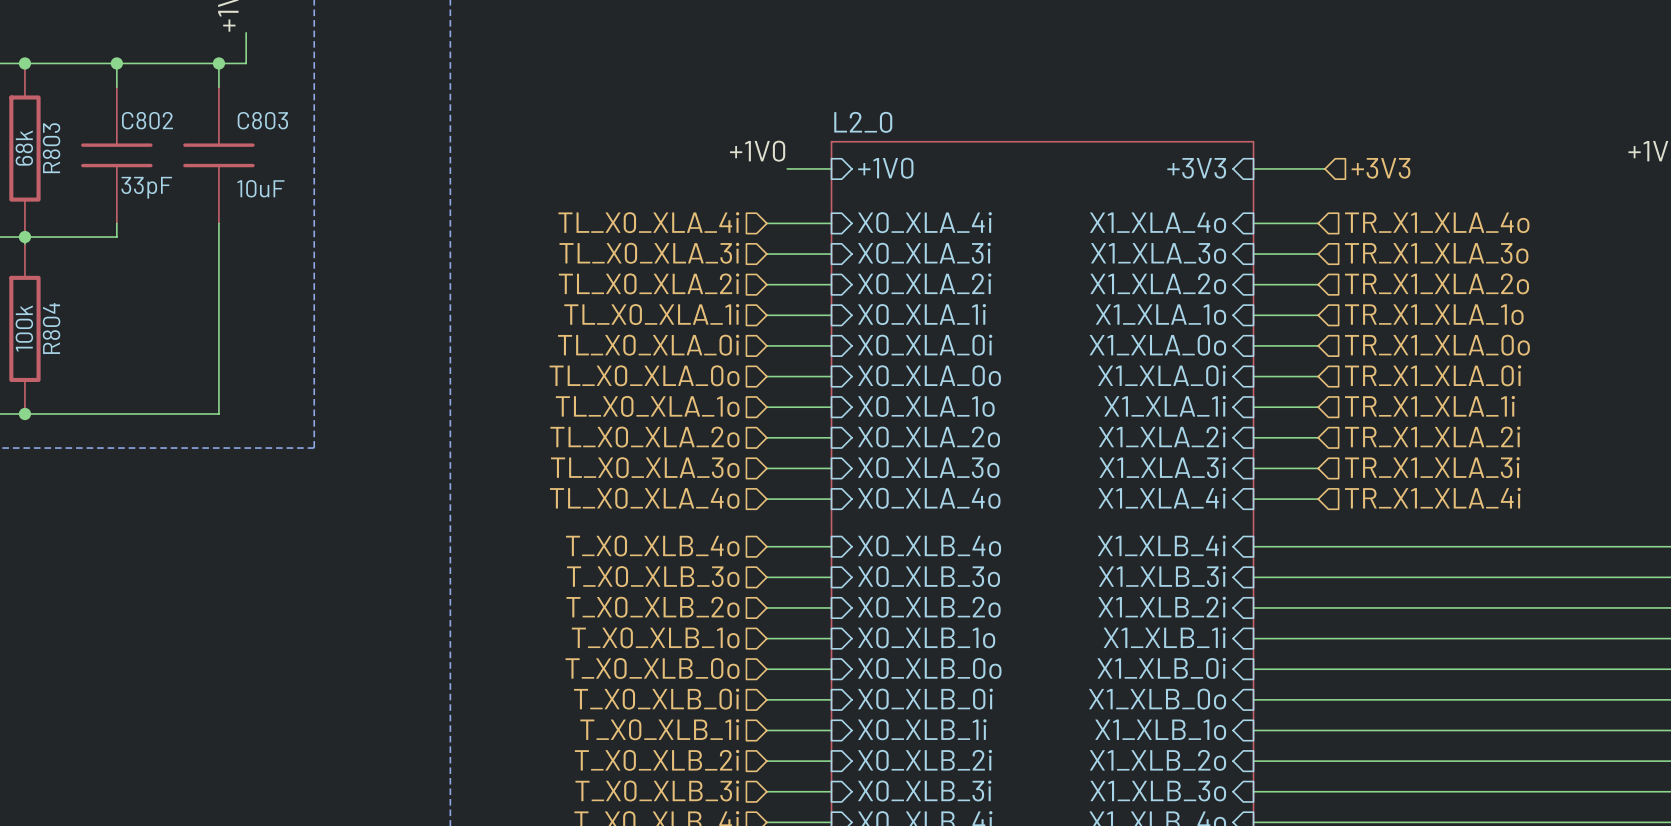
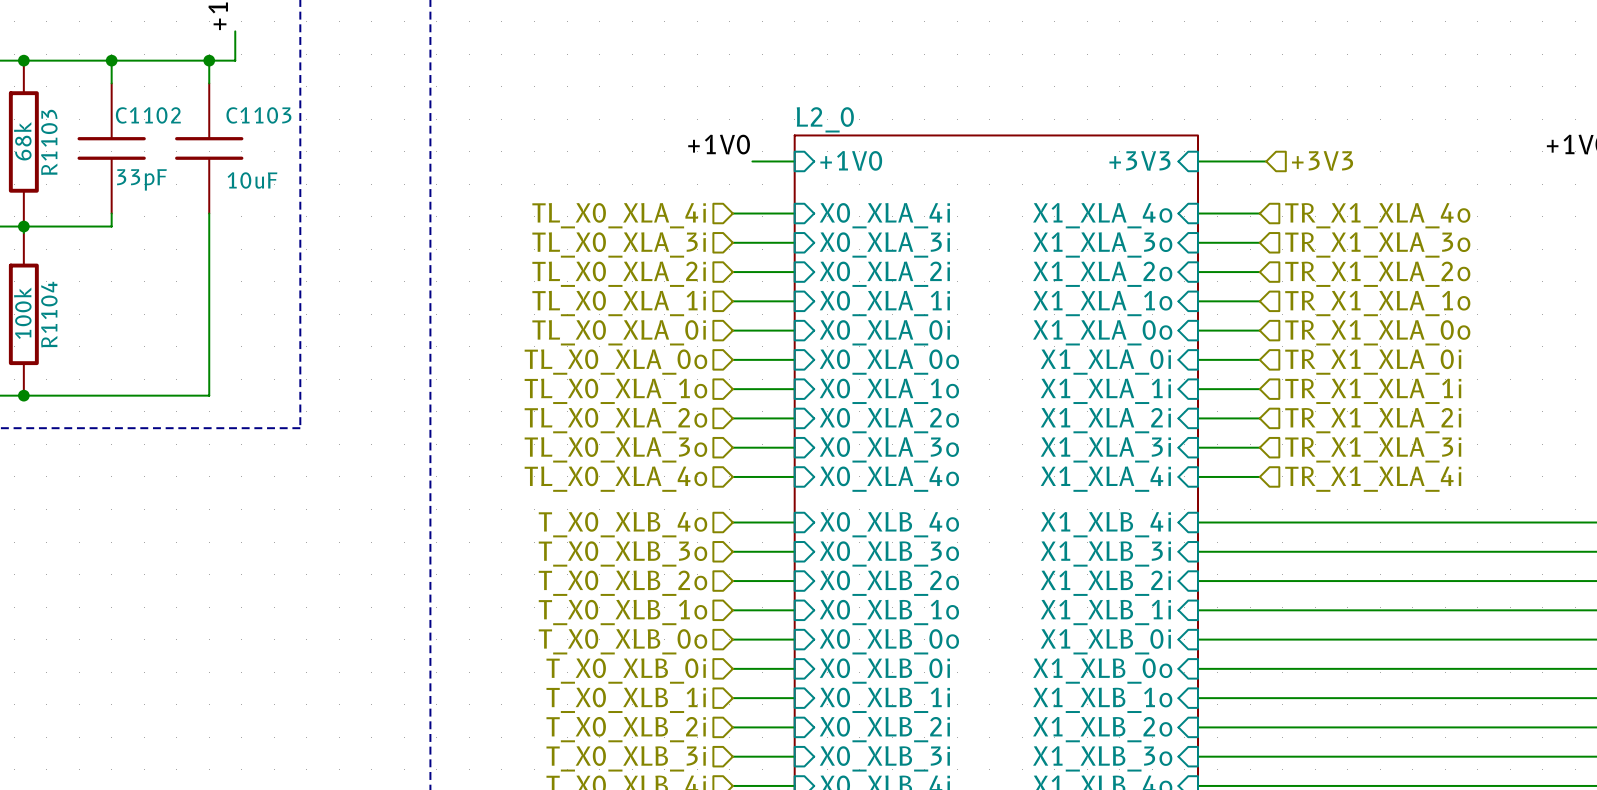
C802 name: C802 (147, 120) -> C1102 (148, 115)
C803 name: C803 (262, 120) -> C1103 (258, 115)
R803 name: R803 (51, 148) -> R1103 (49, 142)
R804 name: R804 (51, 328) -> R1104 (49, 314)

